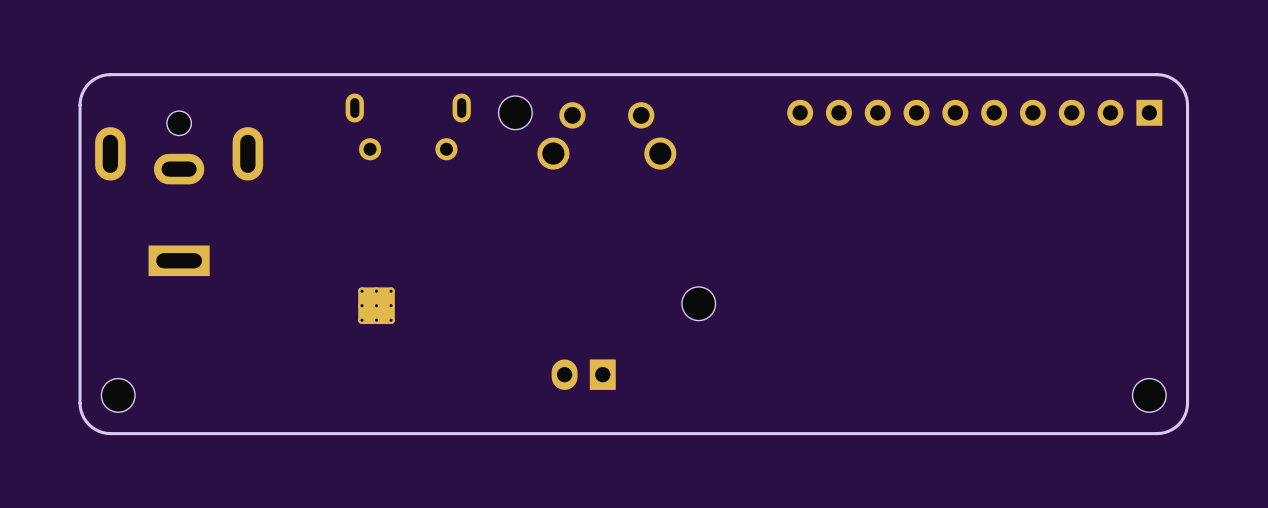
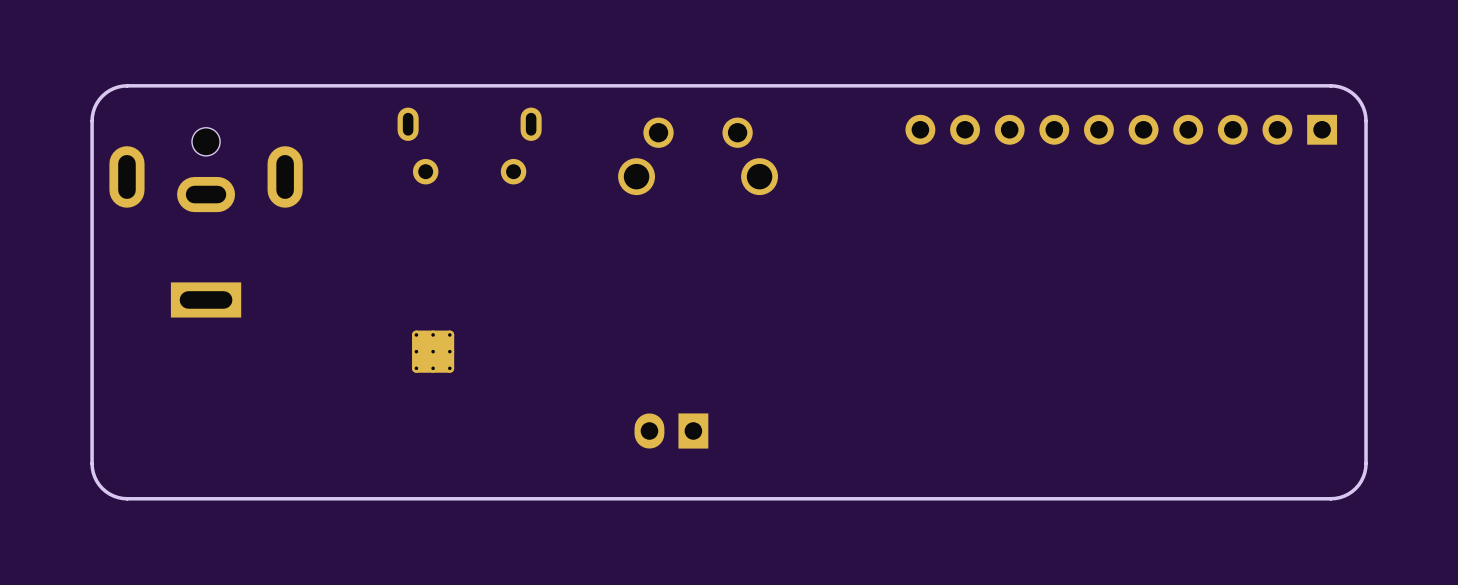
part: (515, 112) -> none
part: (698, 303) -> none
part: (118, 395) -> none
part: (1149, 395) -> none

